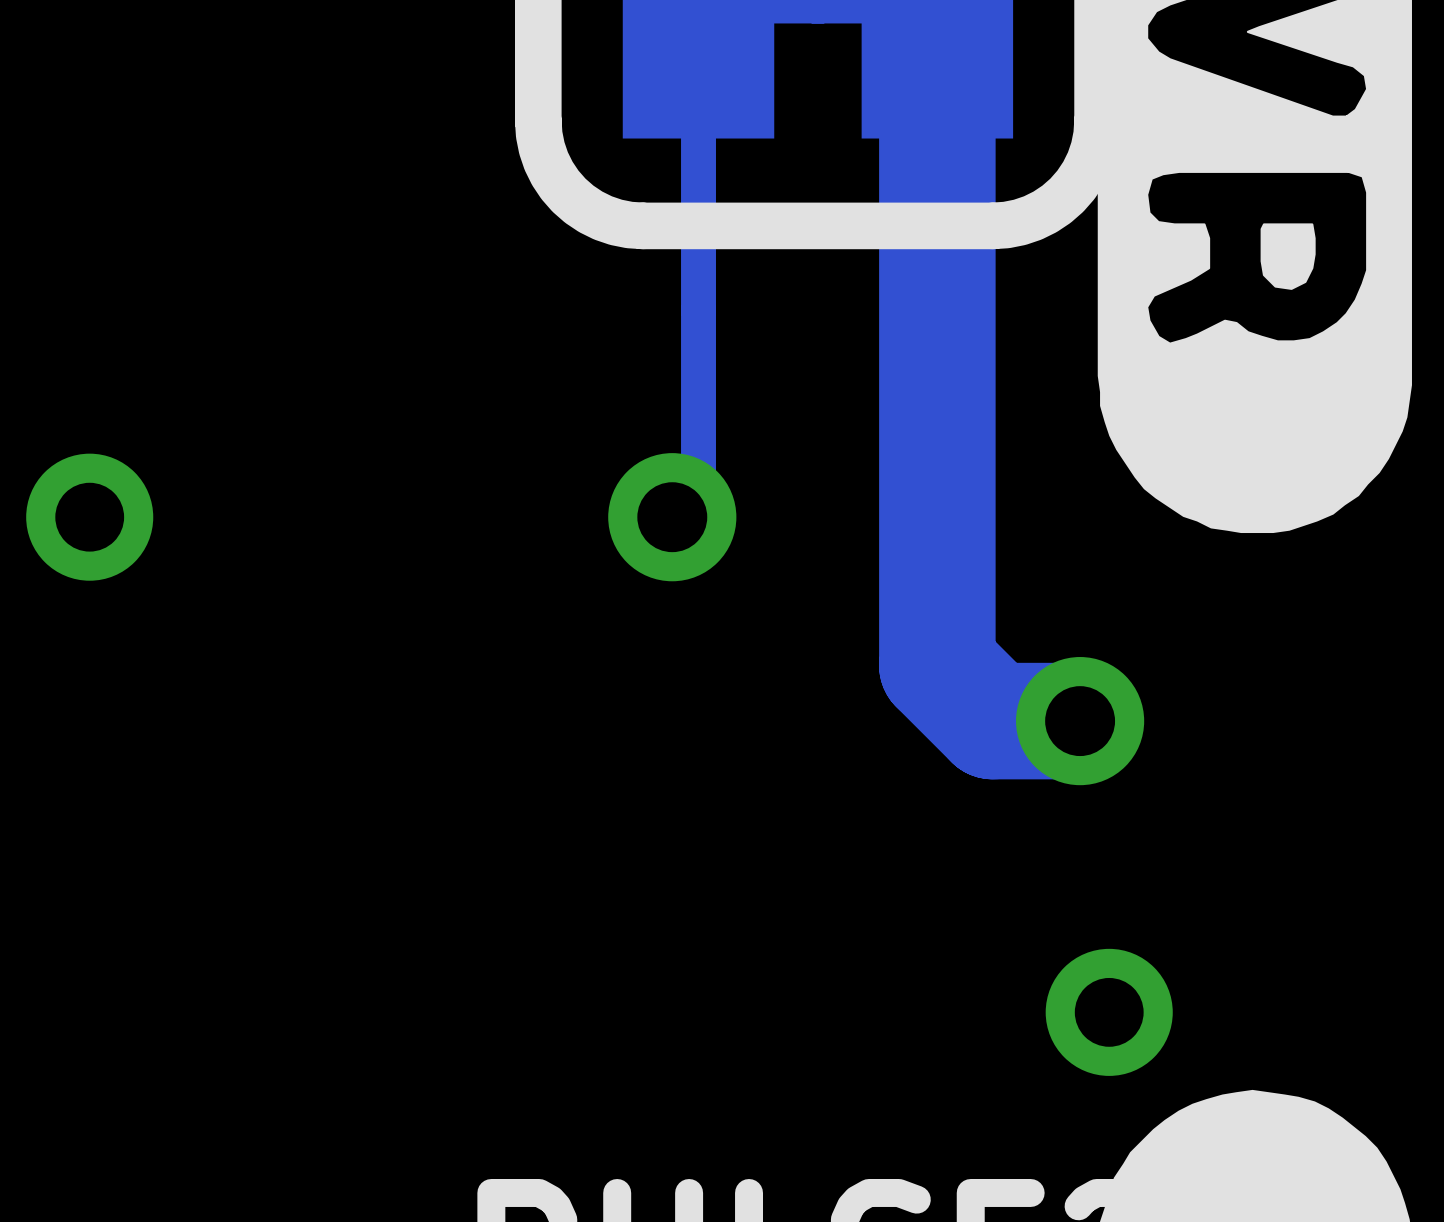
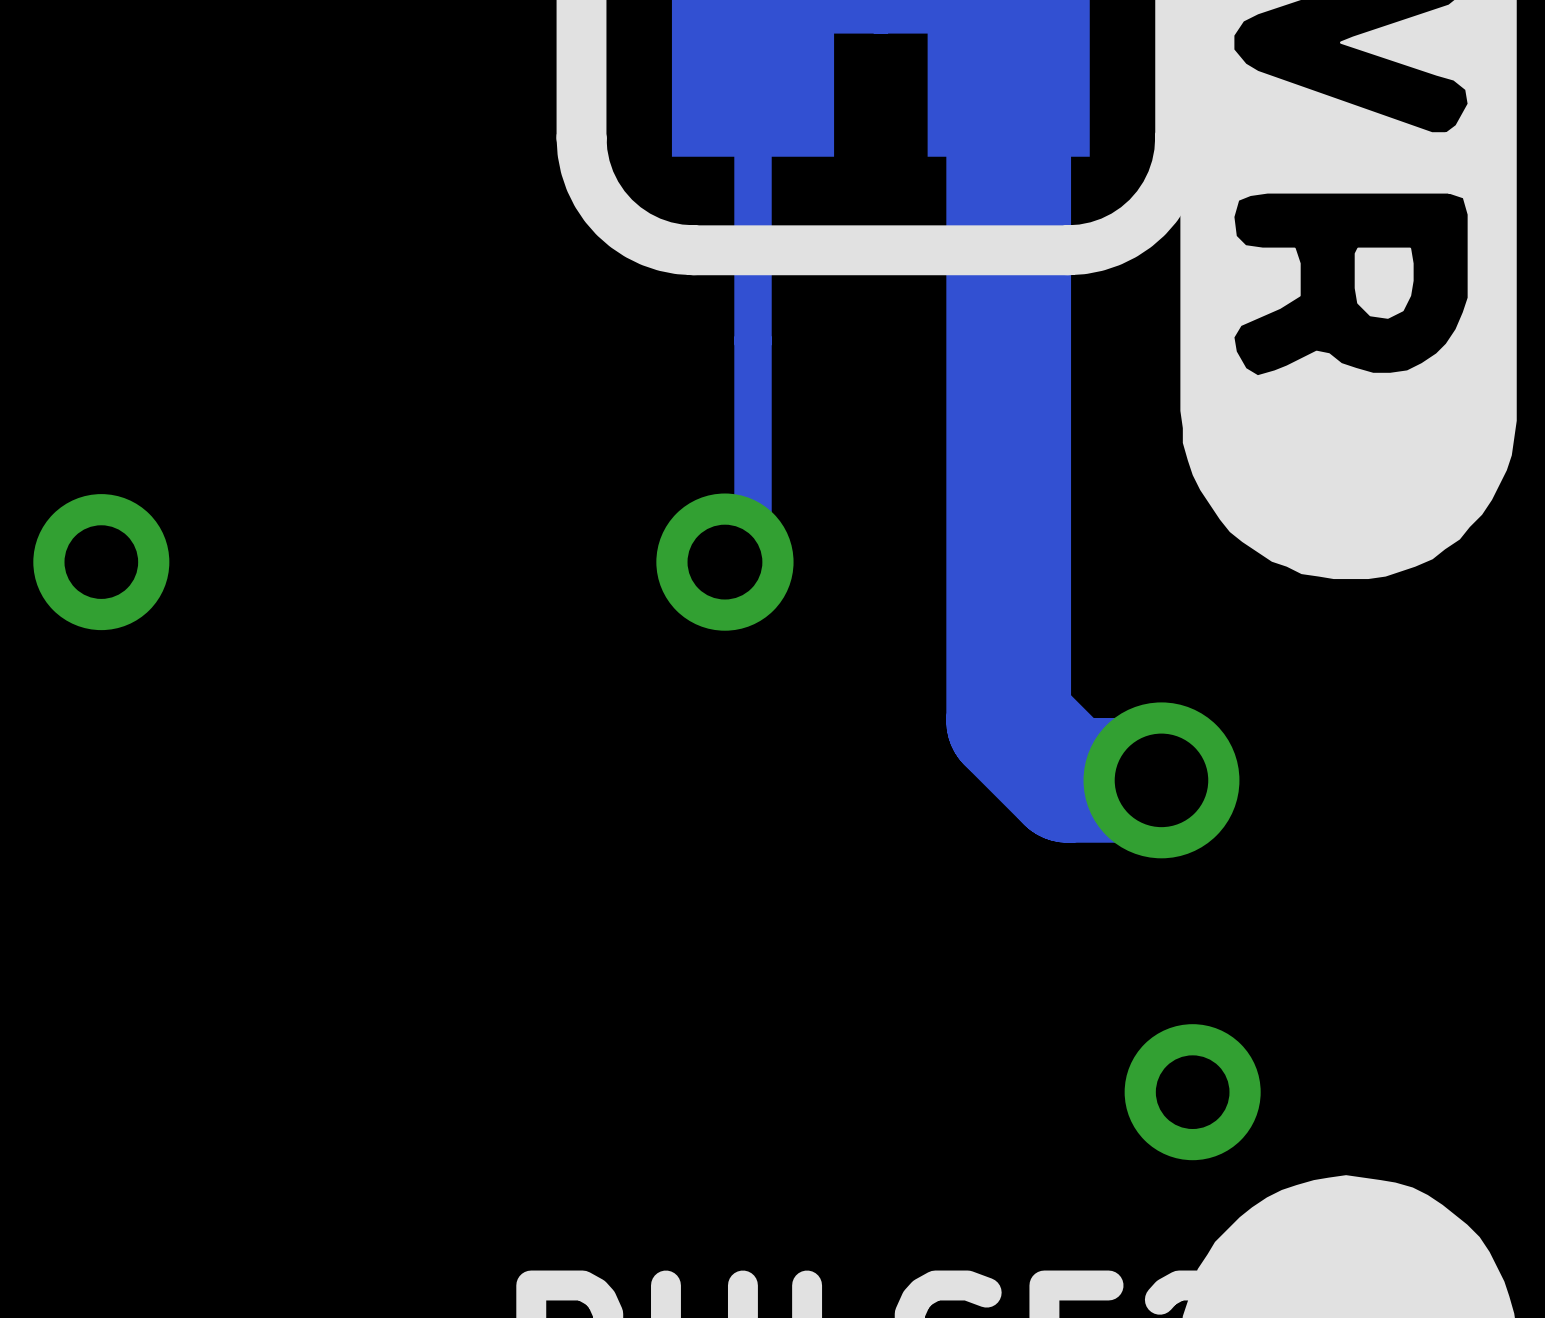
via size: [1016, 657, 1145, 786] -> [1083, 702, 1240, 859]

